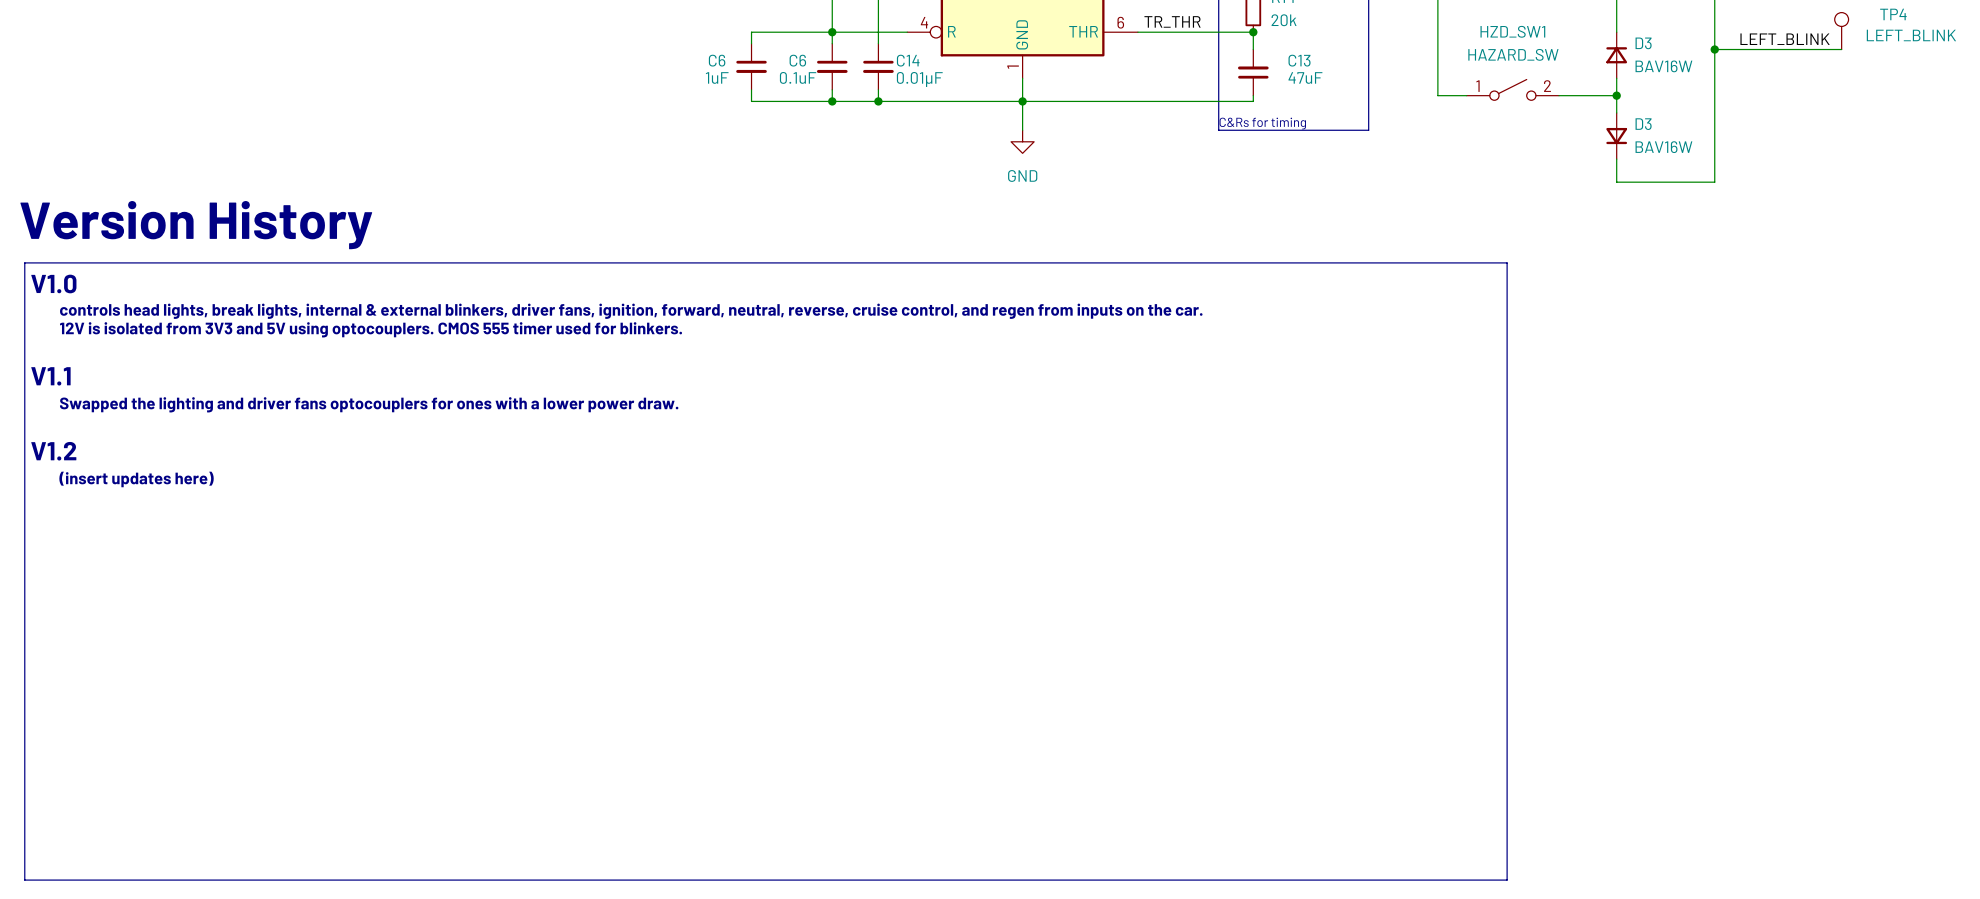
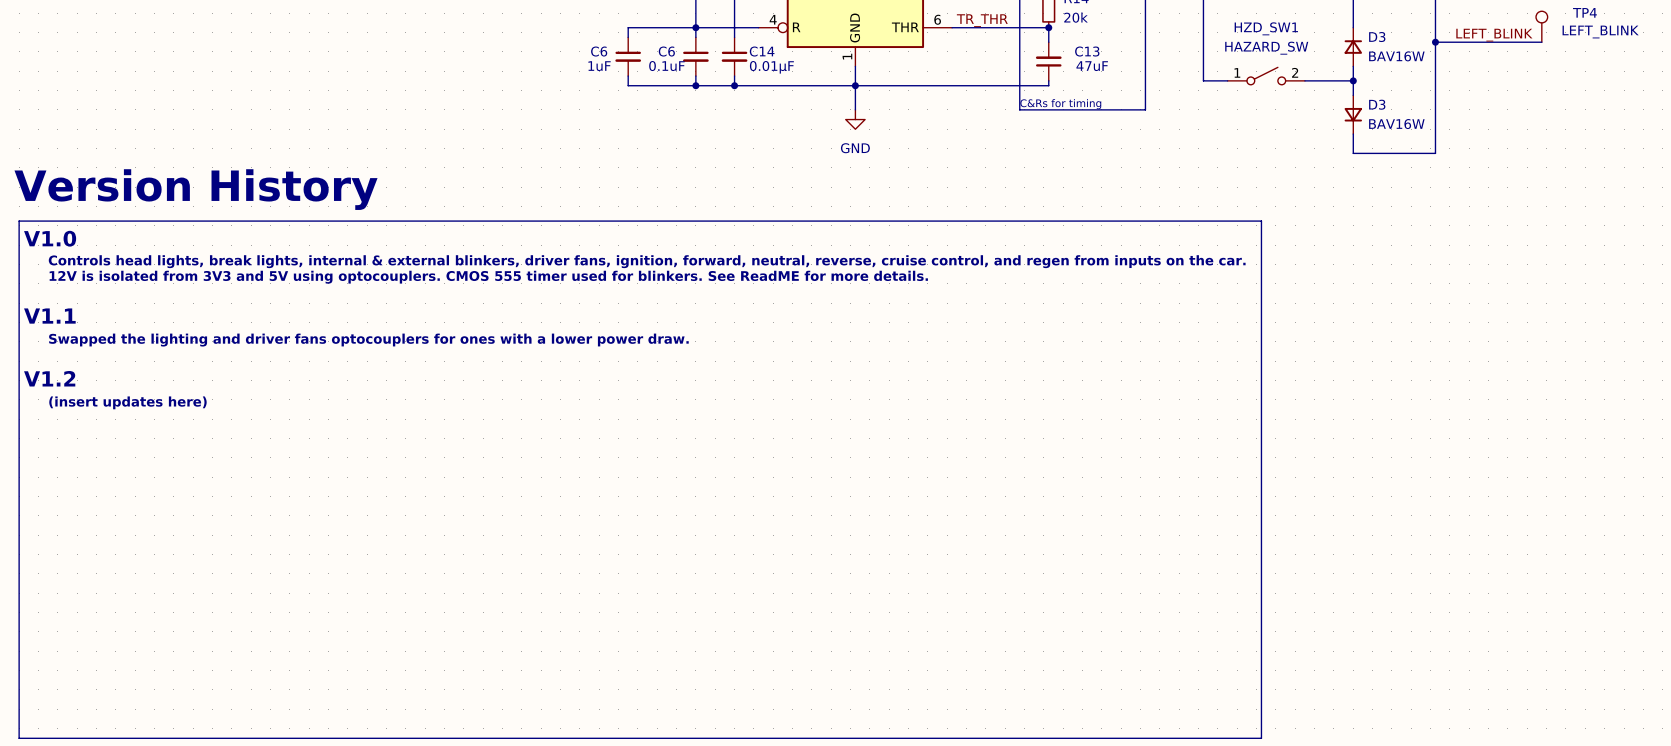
text: controls head lights, break lights, internal & external blinkers, driver fans, ignition, forward, neutral, reverse, cruise control, and regen from inputs on the car. (631, 311) -> Controls head lights, break lights, internal & external blinkers, driver fans, ignition, forward, neutral, reverse, cruise control, and regen from inputs on the car. (647, 261)
text: 12V is isolated from 3V3 and 5V using optocouplers. CMOS 555 timer used for blinkers. (370, 329) -> 12V is isolated from 3V3 and 5V using optocouplers. CMOS 555 timer used for blinkers. See ReadME for more details. (488, 277)

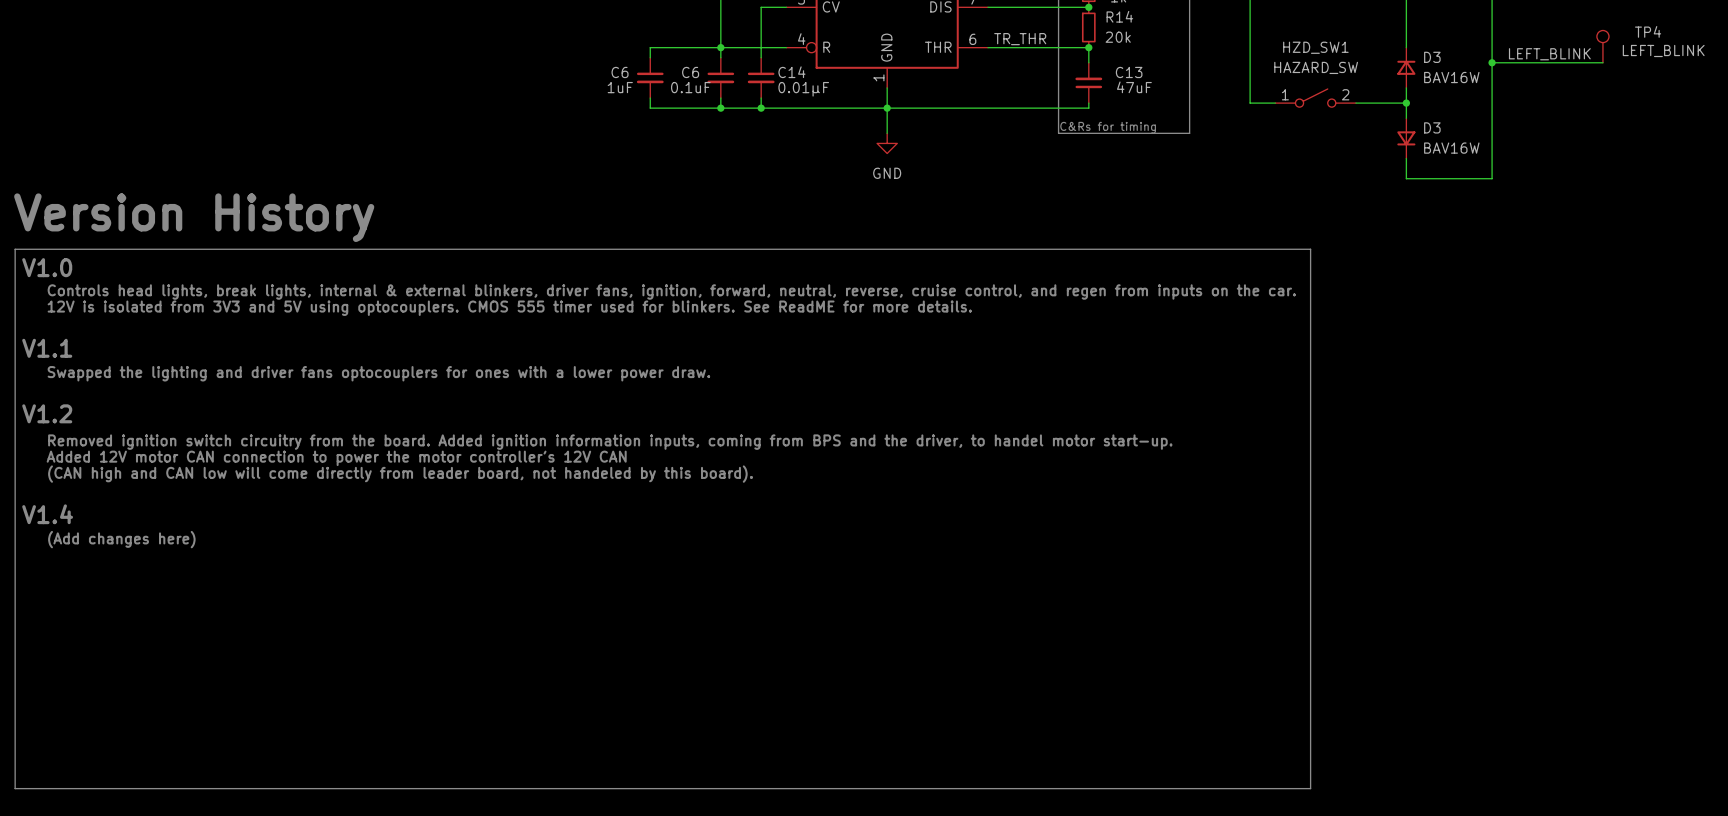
text: (insert updates here) (127, 402) -> Removed ignition switch circuitry from the board. Added ignition information inputs, coming from BPS and the driver, to handel motor start-up. (610, 442)
text: none -> Added 12V motor CAN connection to power the motor controller's 12V CAN (336, 458)
text: none -> (CAN high and CAN low will come directly from leader board, not handeled by this board). (400, 474)
text: none -> V1.4 (47, 514)
text: none -> (Add changes here) (121, 539)

